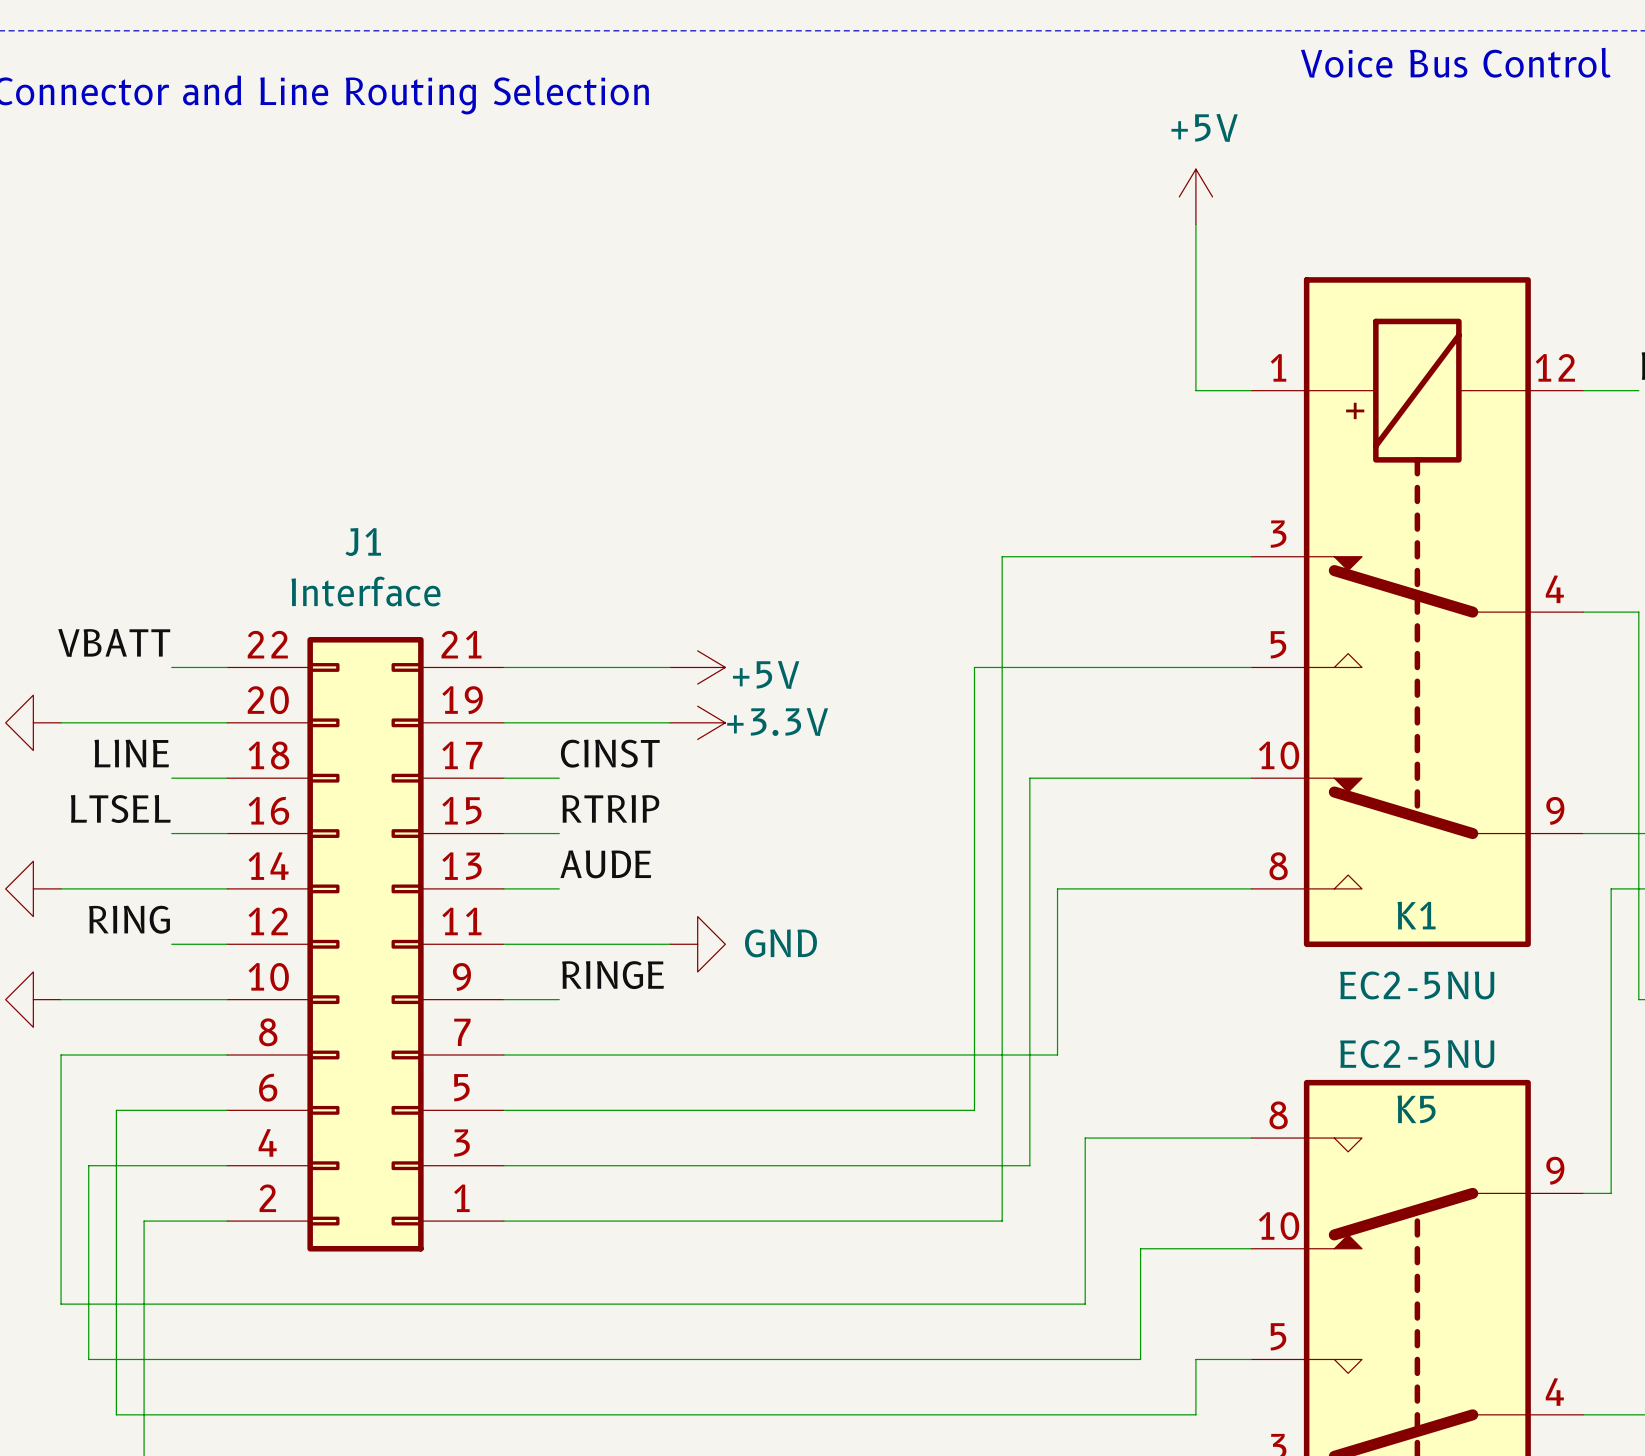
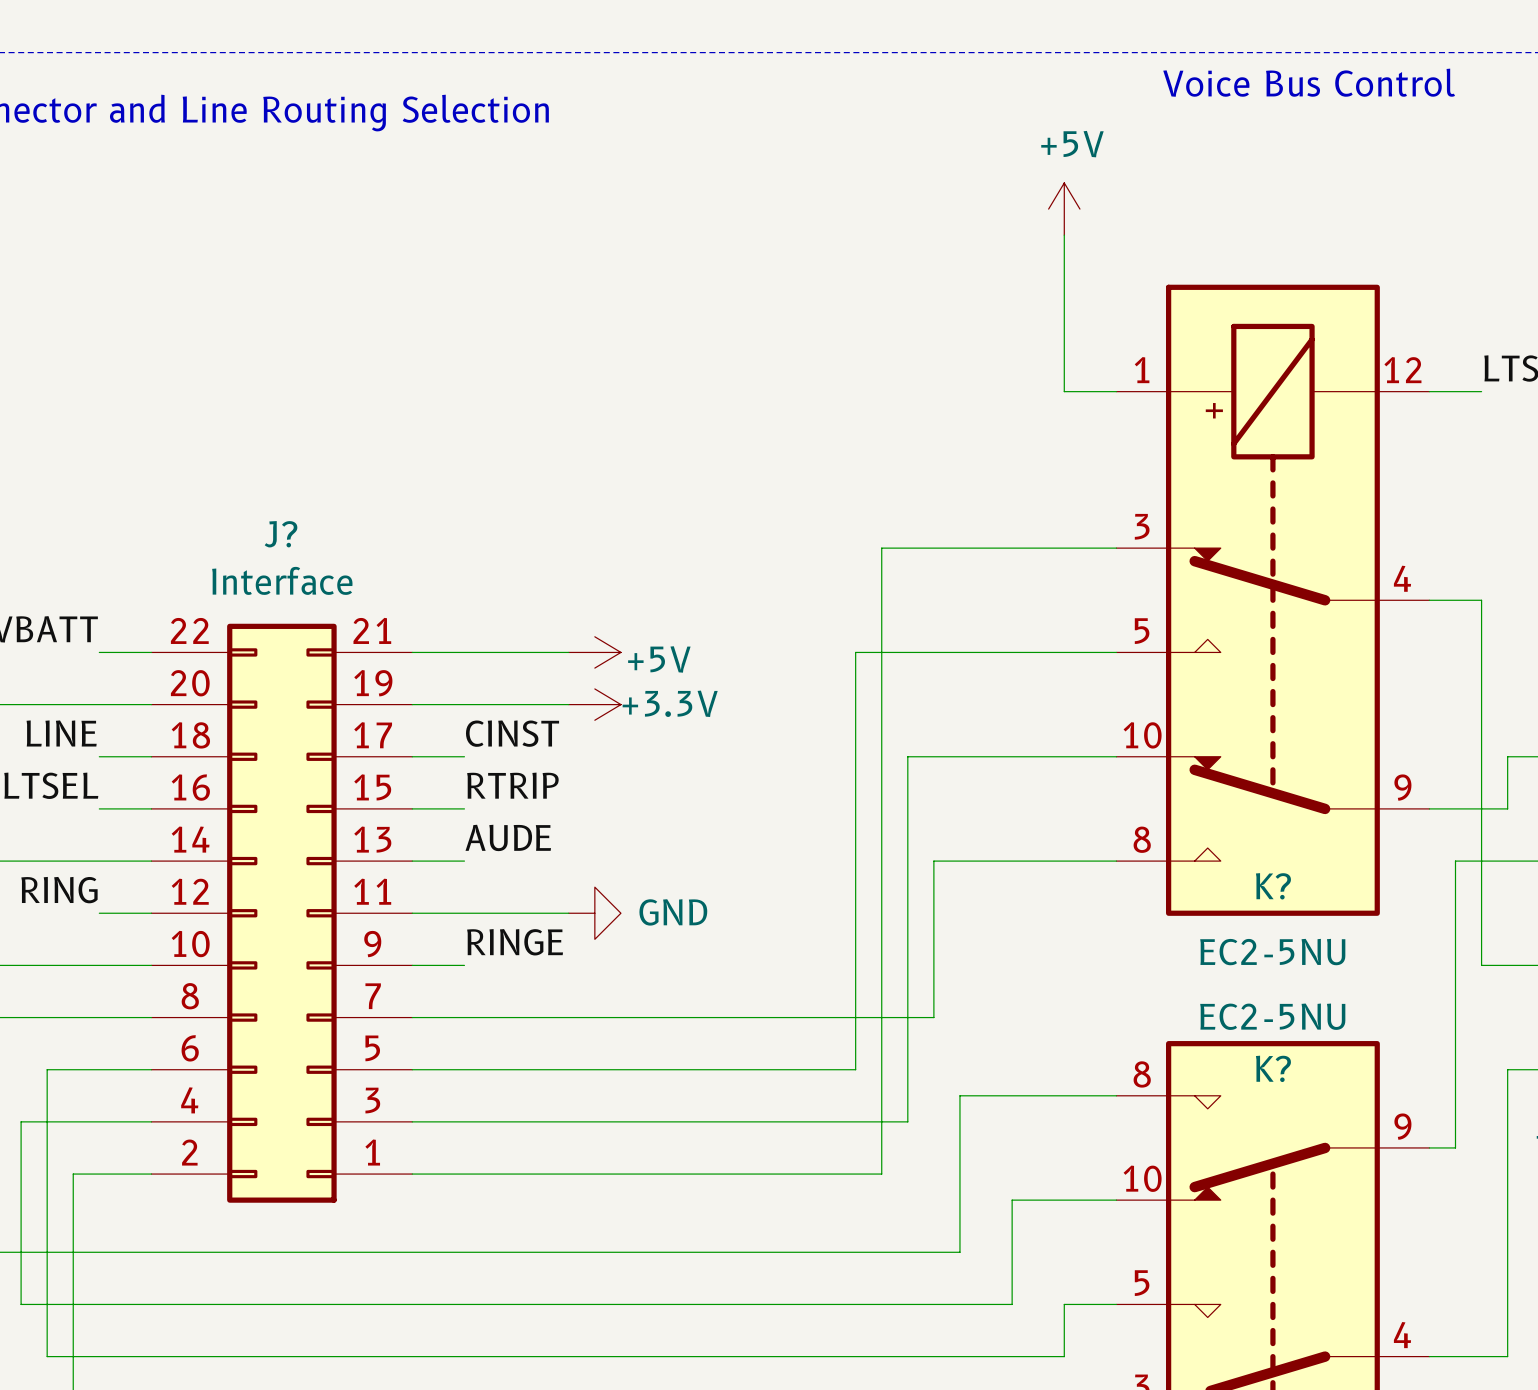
J1 name: J1 (363, 542) -> J? (281, 534)
K1 name: K1 (1416, 915) -> K? (1273, 886)
K5 name: K5 (1416, 1109) -> K? (1273, 1068)

